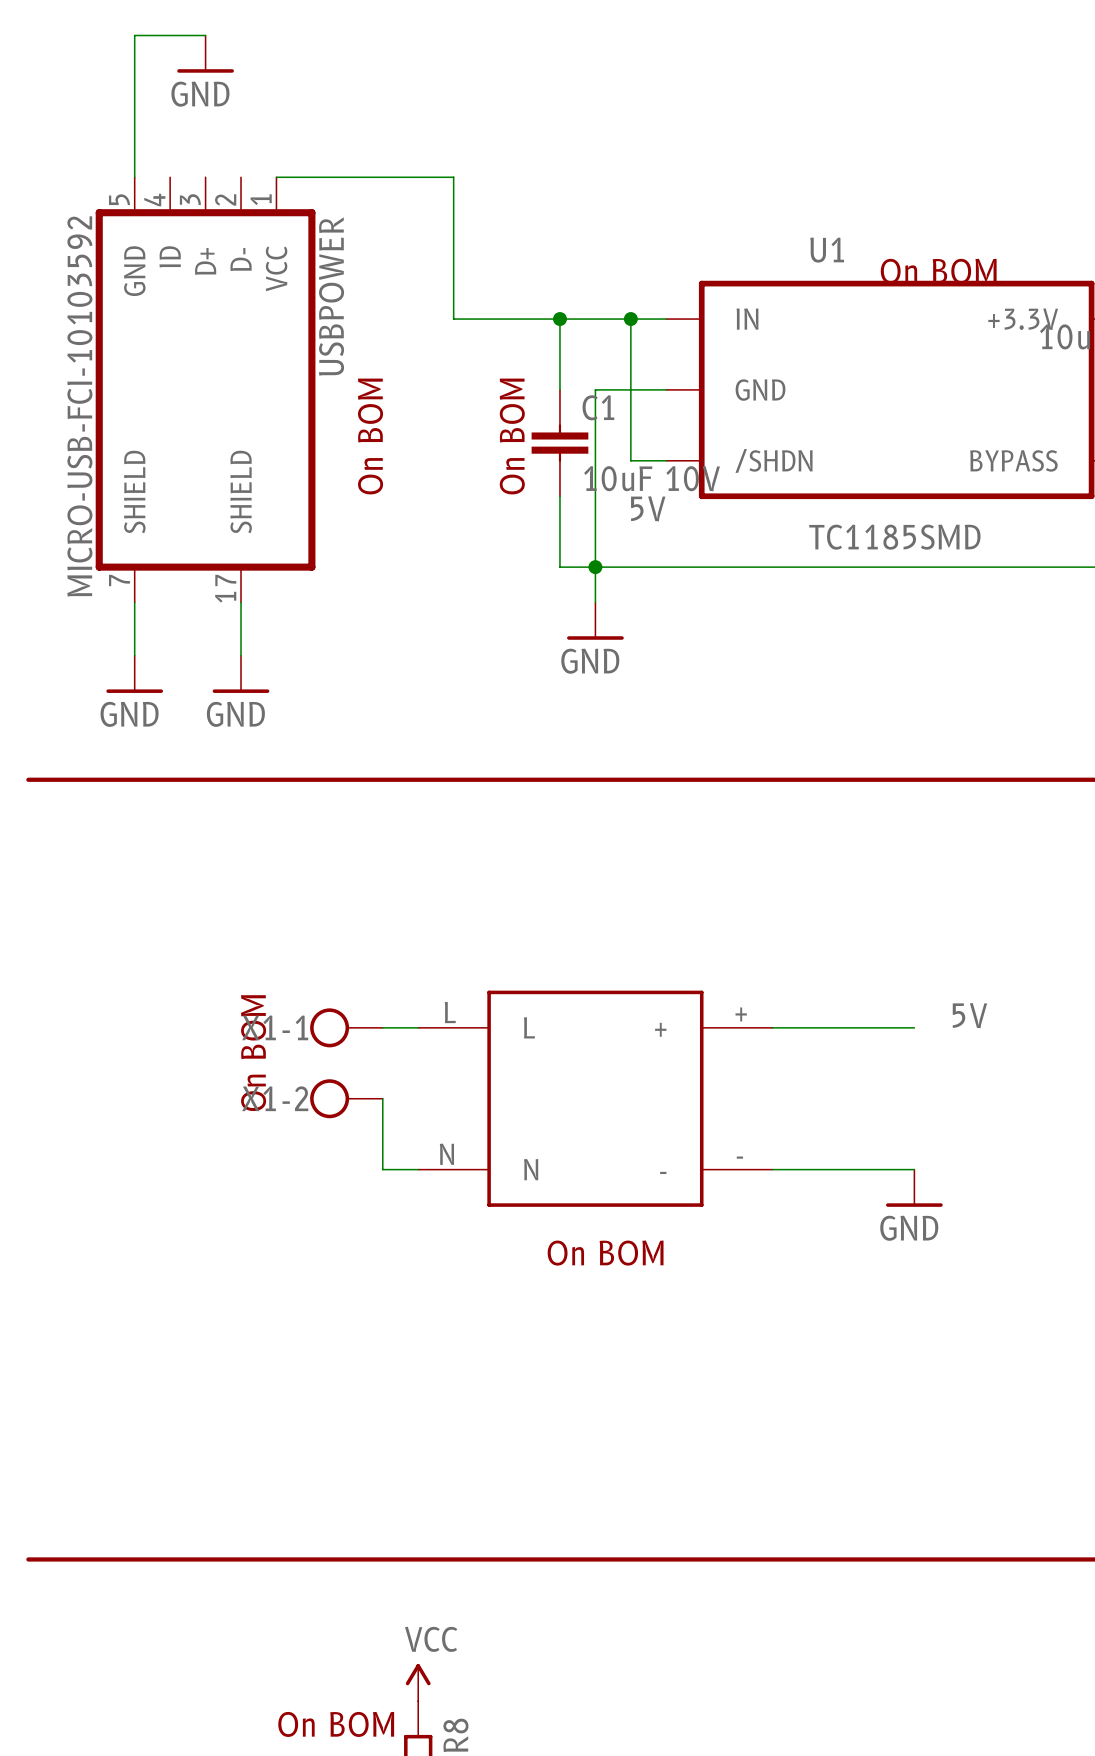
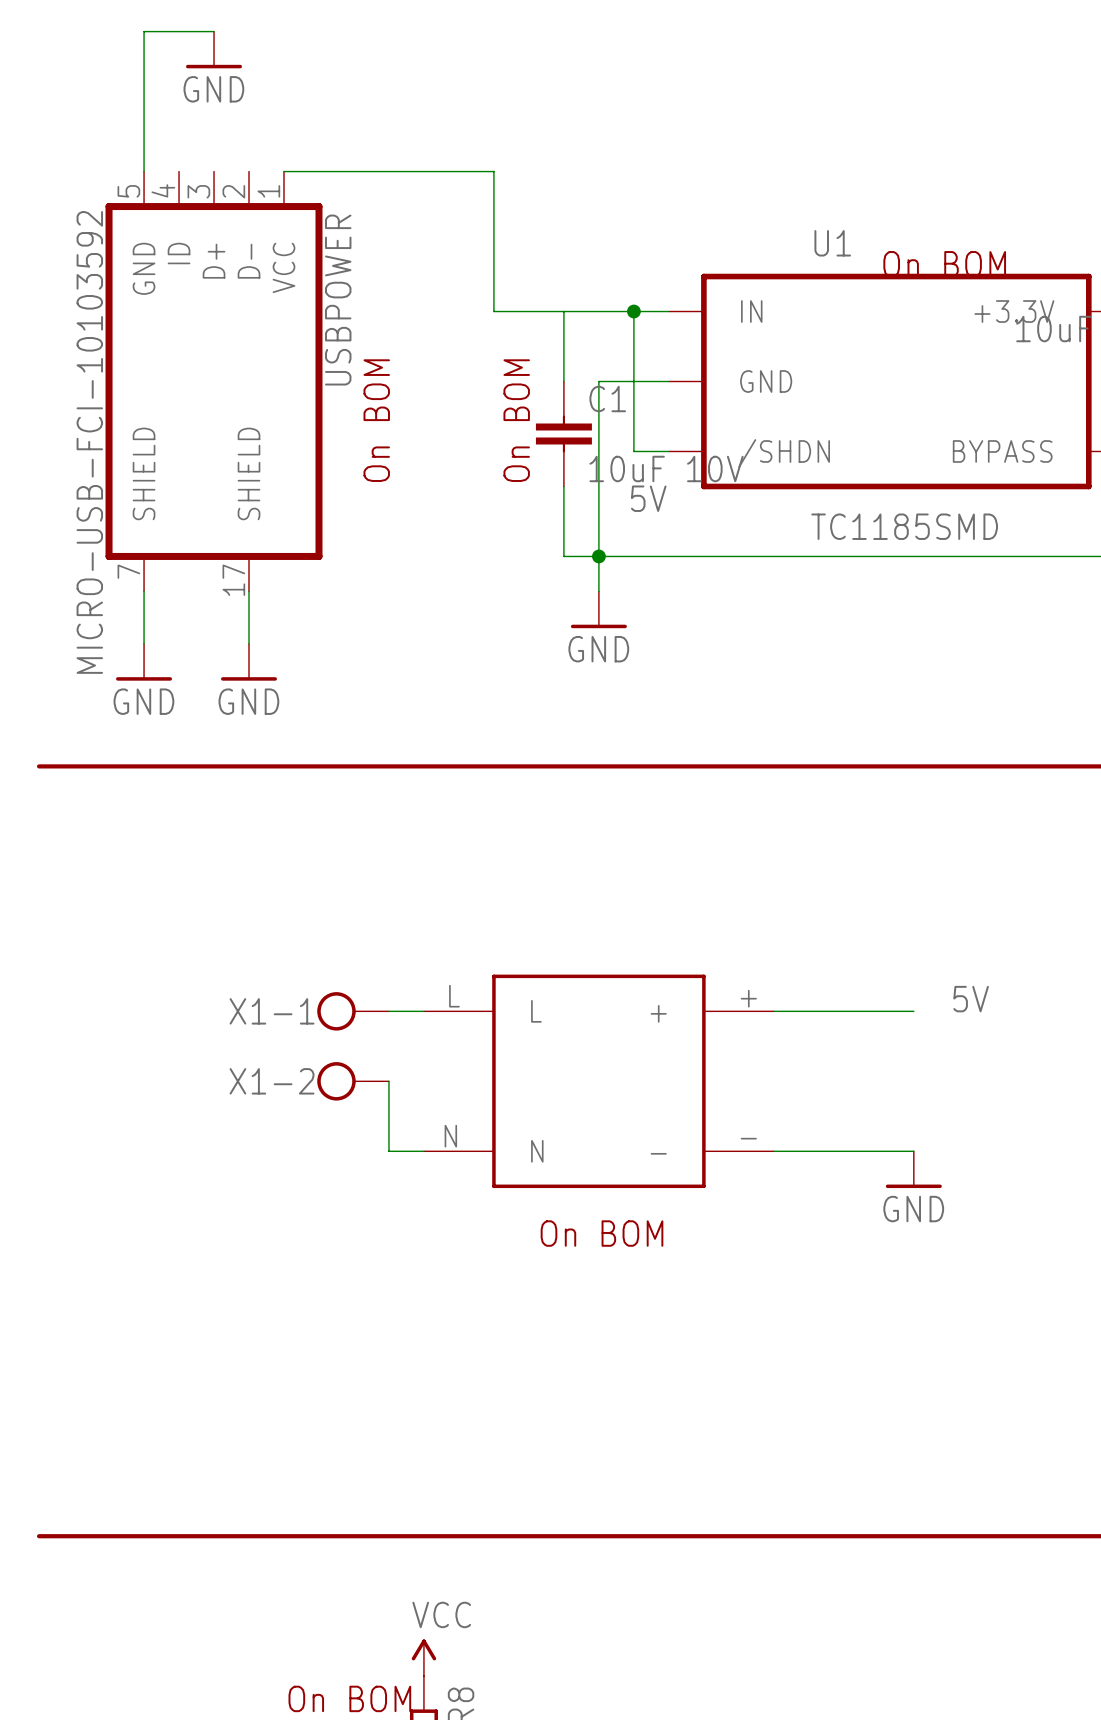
wire: (453, 177) (453, 319) (489, 319) -> (458, 171) (493, 171) (493, 311)
junction: (559, 319) -> none
text: On BOM (253, 1053) -> none

